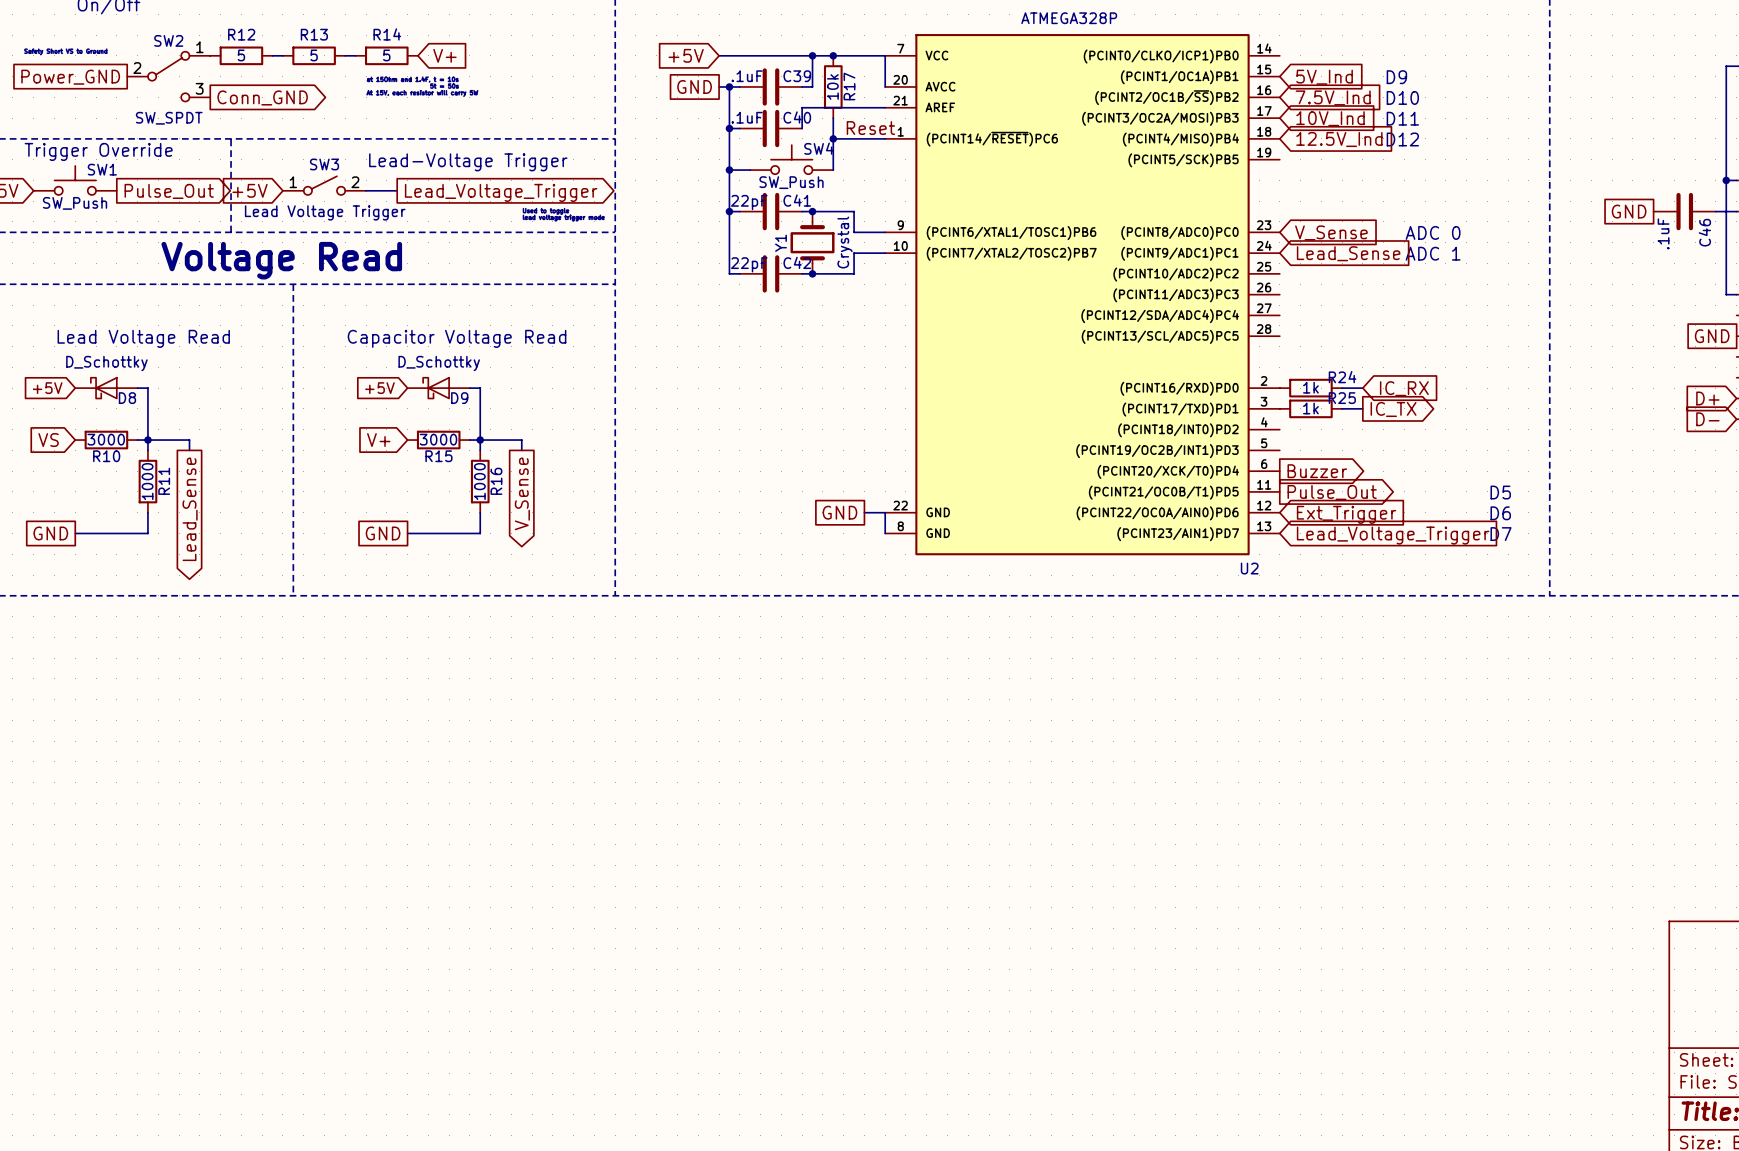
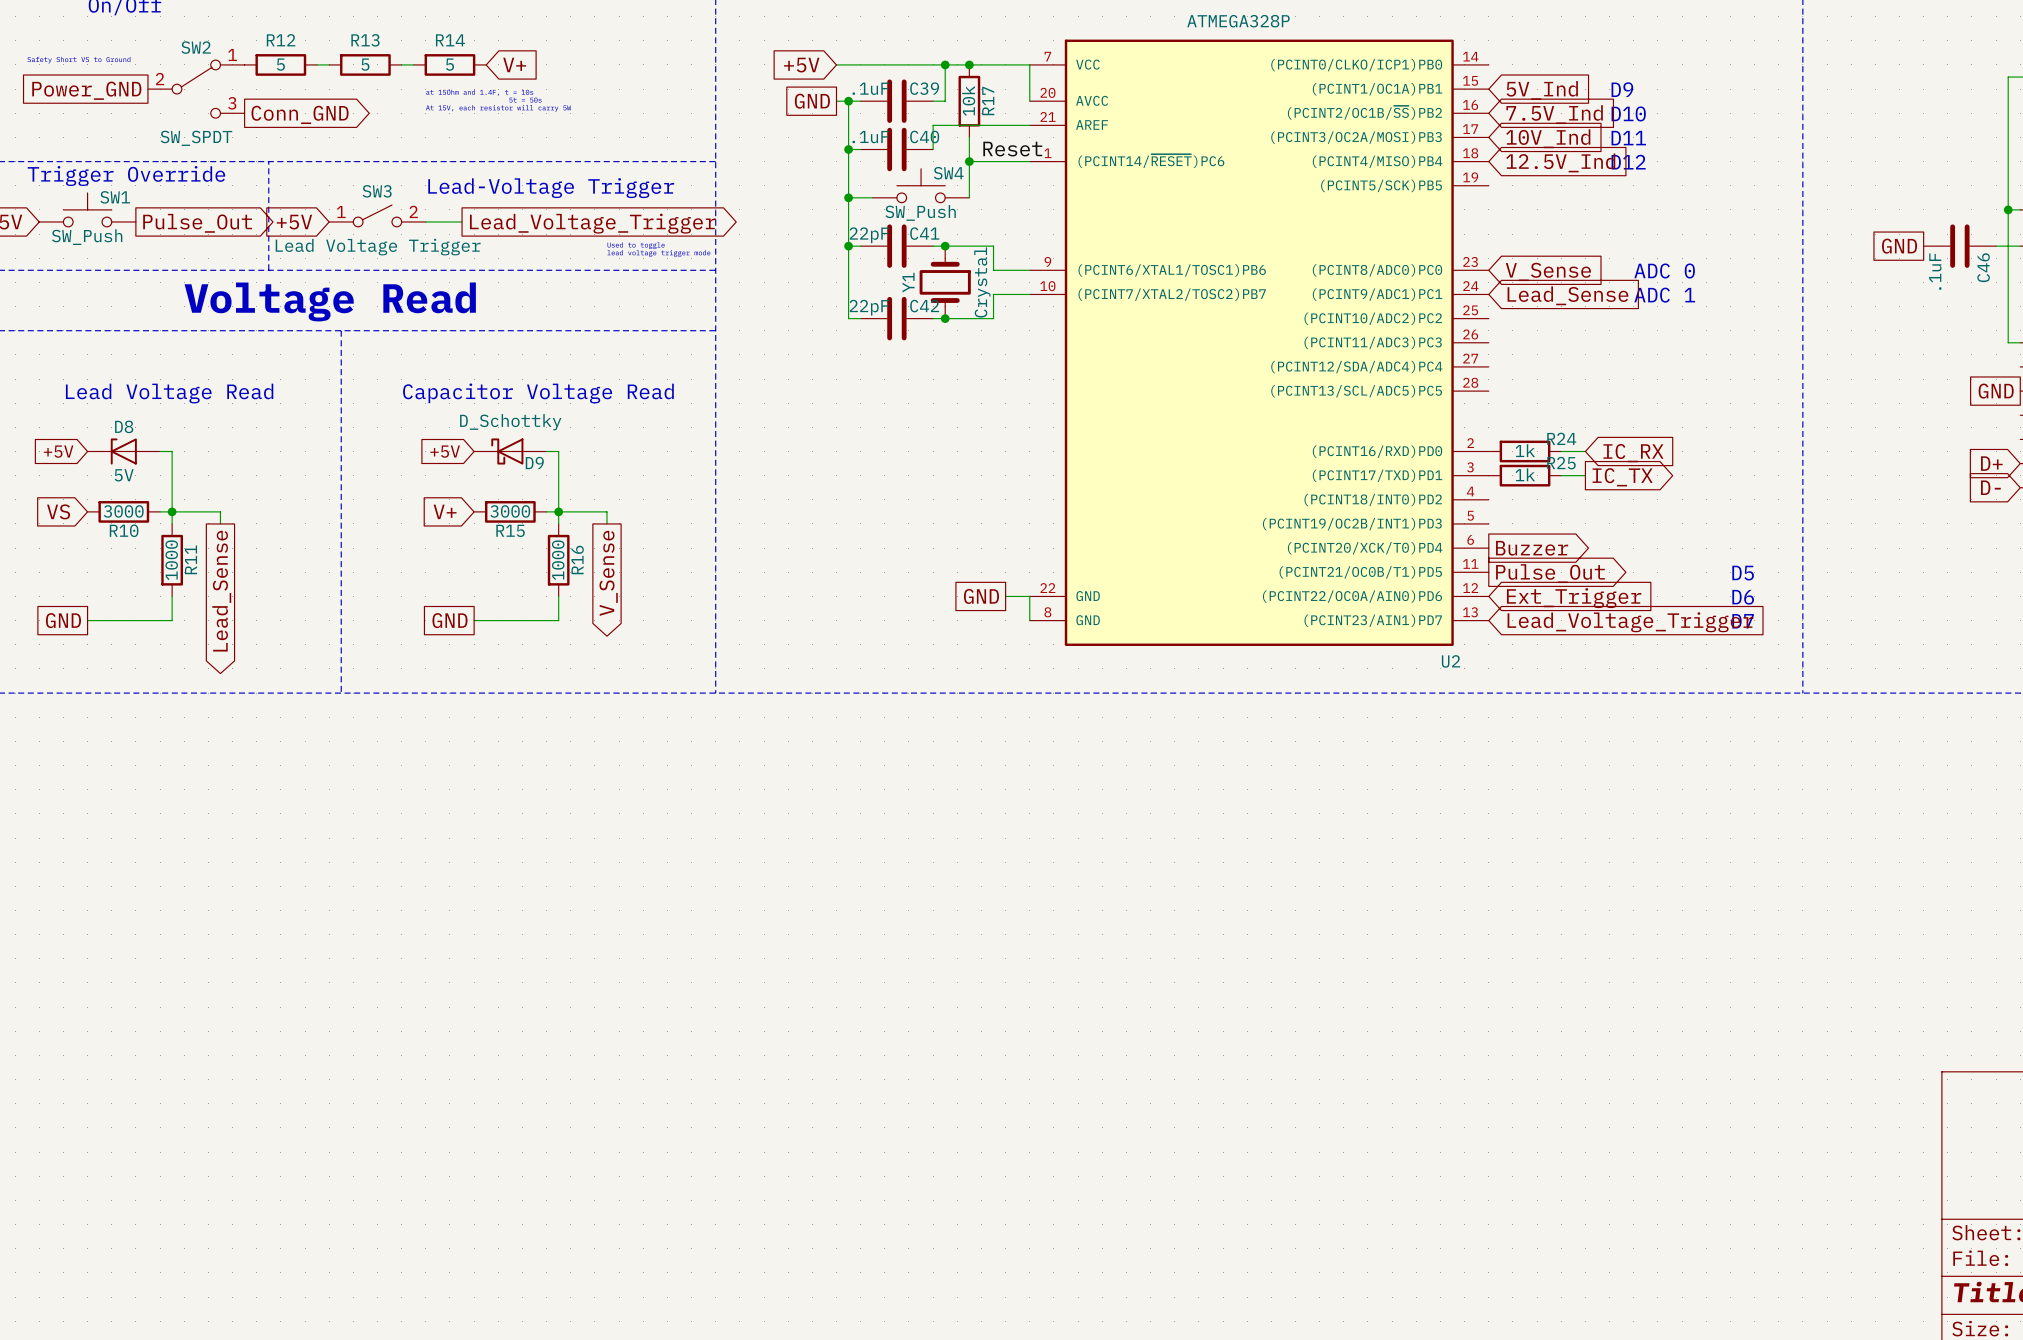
D8 value: D_Schottky (106, 363) -> 5V (124, 475)
D8 symbol: [75, 376, 138, 400] -> [87, 438, 161, 465]
D8 name position: D8 (127, 398) -> D8 (124, 426)

